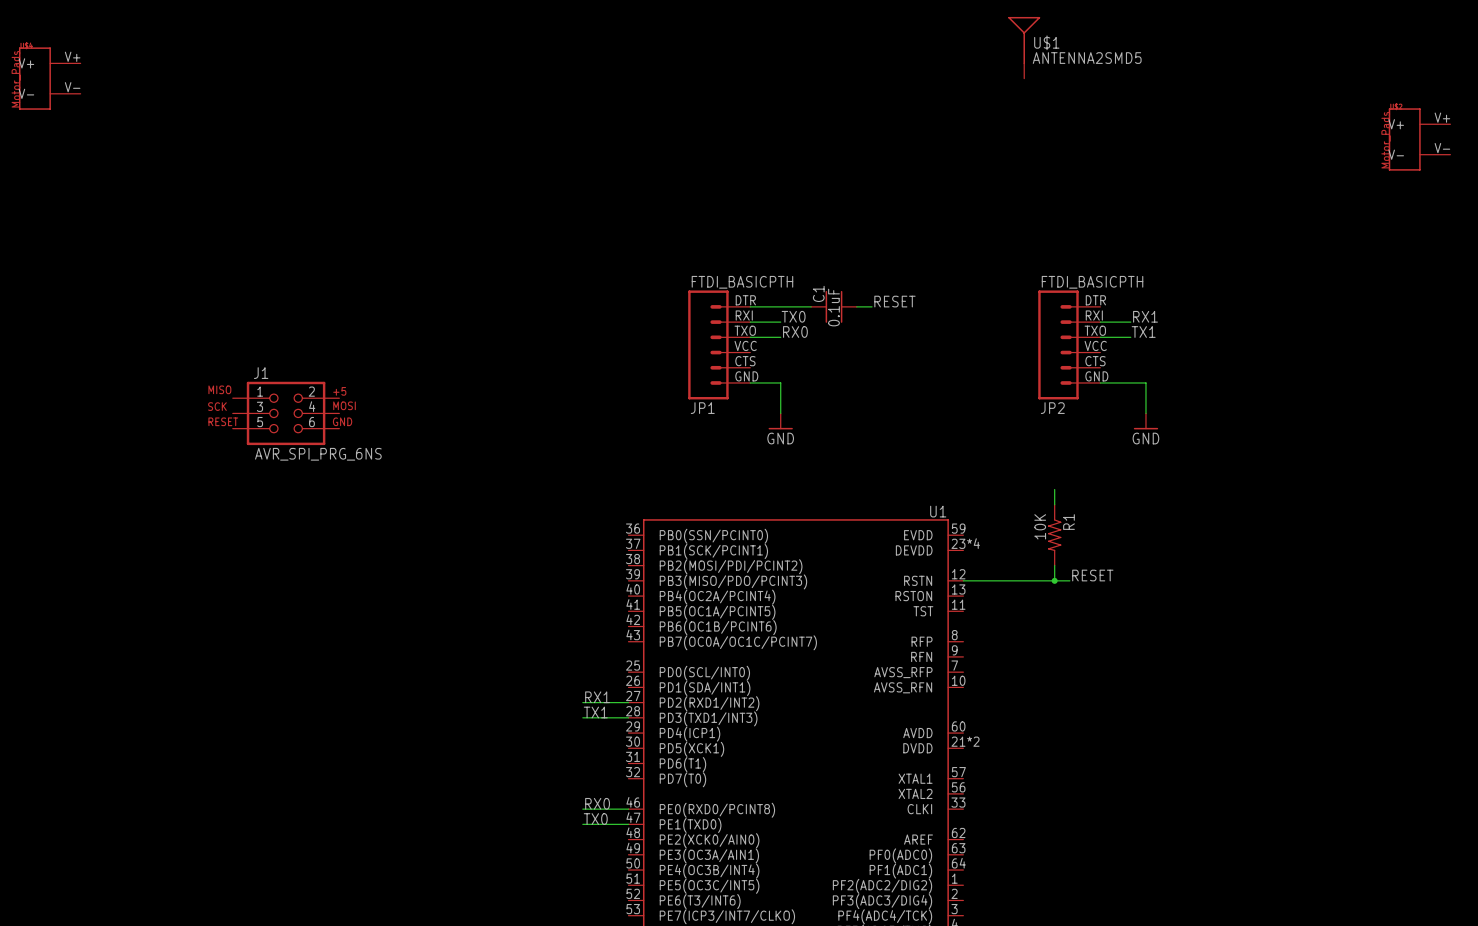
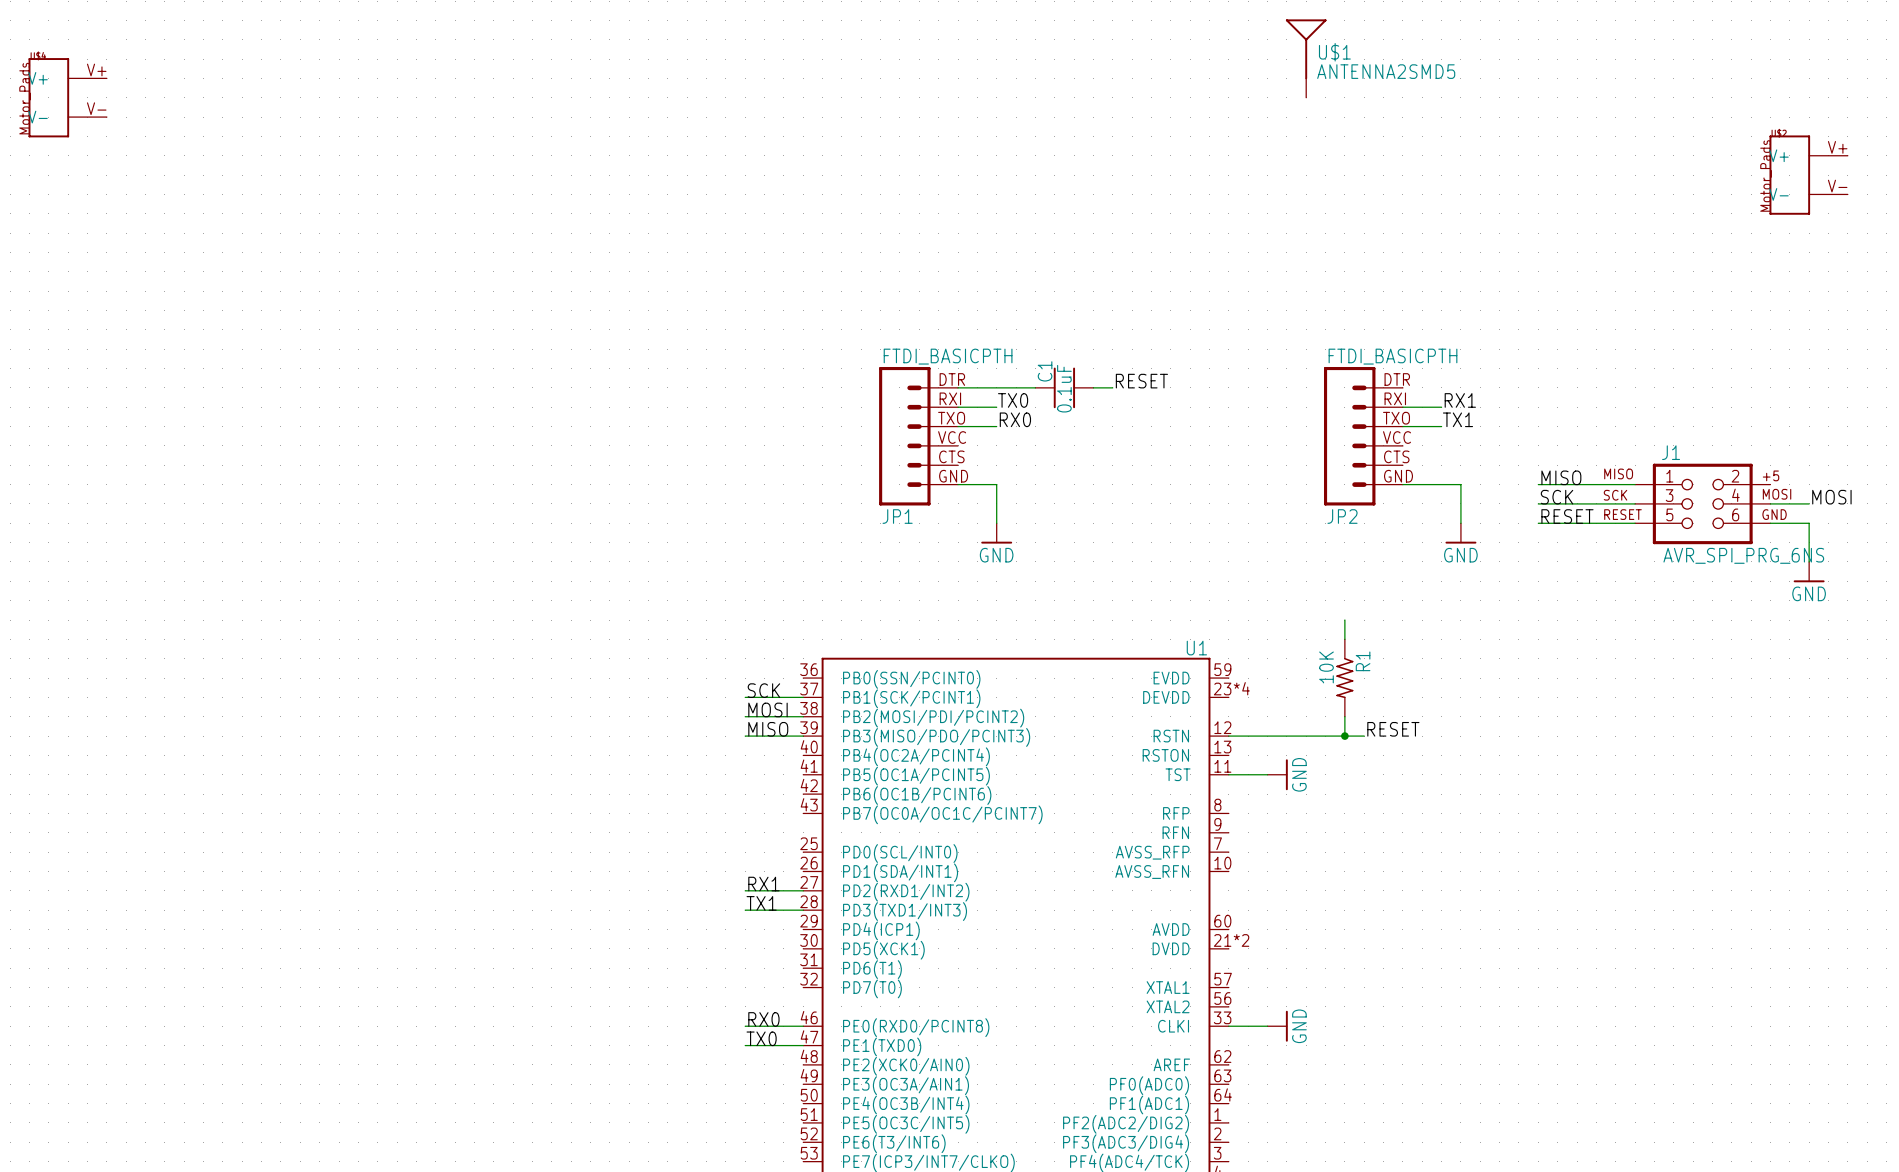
label: none -> MISO (1561, 477)
wire: none -> (1538, 484) (1635, 484)
label: none -> SCK (1557, 497)
label: none -> MOSI (1831, 497)
wire: none -> (1538, 503) (1635, 503)
wire: none -> (1770, 503) (1809, 503)
label: none -> RESET (1567, 516)
J1 position: (286, 413) -> (1702, 503)
wire: none -> (1538, 523) (1635, 523)
wire: none -> (1770, 523) (1809, 523) (1809, 561)
power symbol: none -> GND (1809, 572)
label: none -> SCK (763, 690)
wire: none -> (745, 697) (803, 697)
label: none -> MOSI (767, 709)
wire: none -> (745, 716) (803, 716)
label: none -> MISO (768, 729)
wire: none -> (745, 736) (803, 736)
wire: none -> (1228, 774) (1267, 774)
power symbol: none -> GND (1277, 774)
wire: none -> (1228, 1026) (1267, 1026)
power symbol: none -> GND (1277, 1026)

